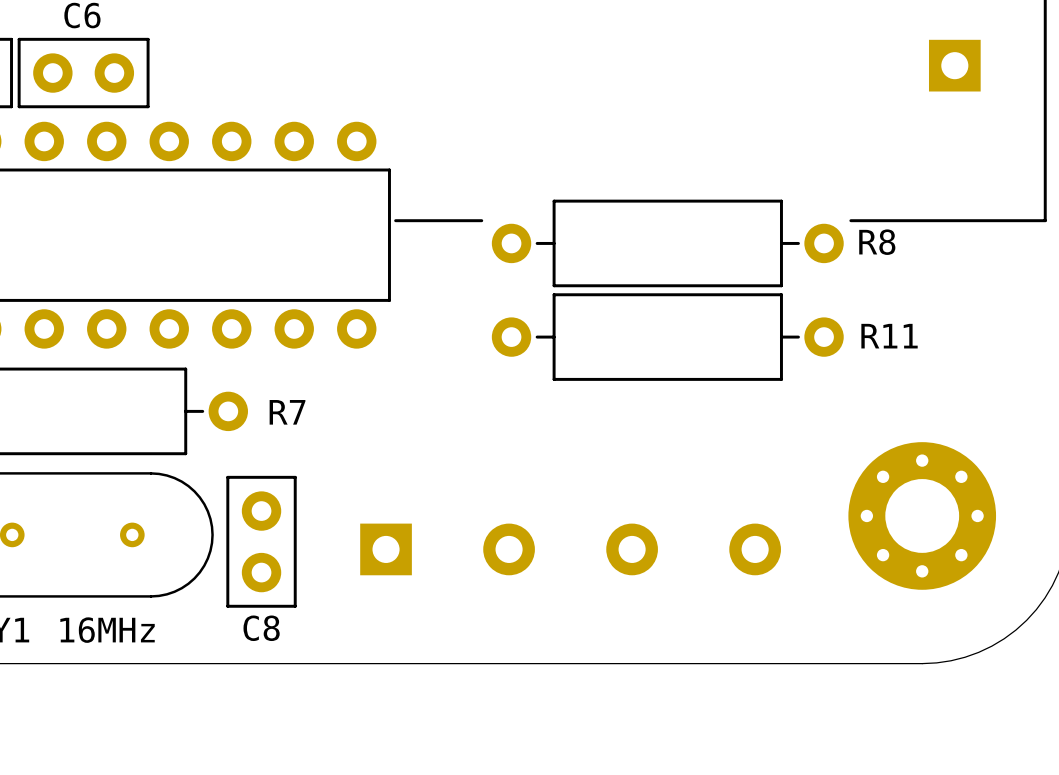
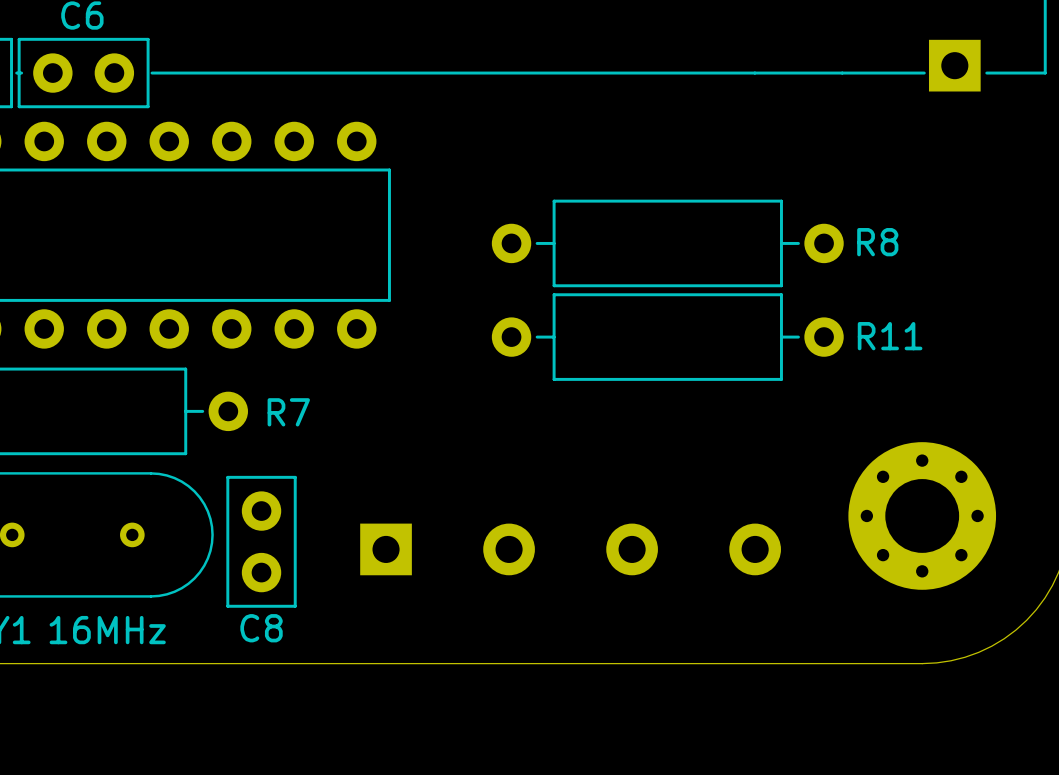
line: none -> (16, 73) (21, 73)
line: none -> (152, 73) (924, 73)
line: (1045, 73) (1045, 220) (850, 220) -> (1045, 73) (986, 73)
line: (395, 220) (481, 220) -> none

